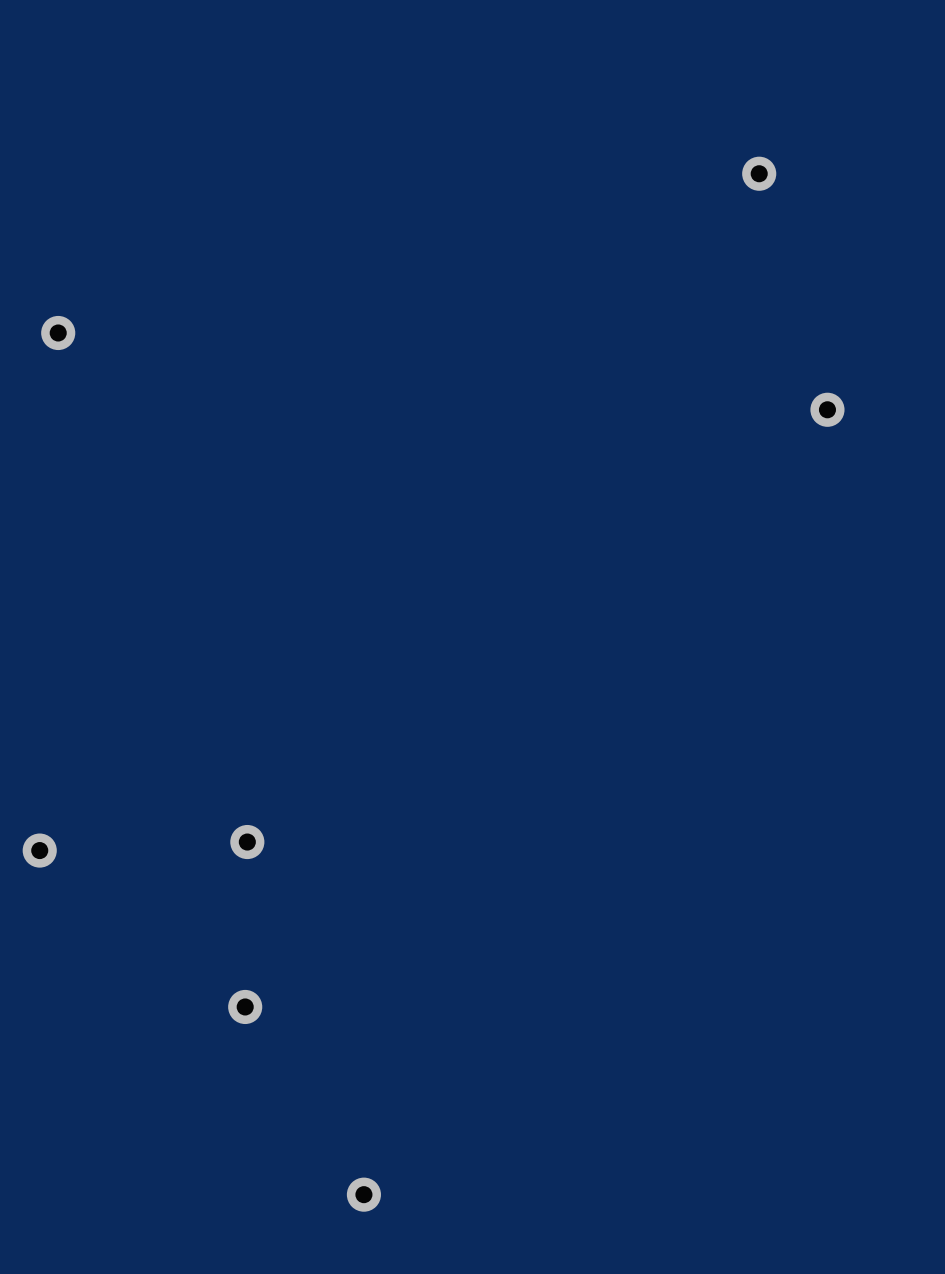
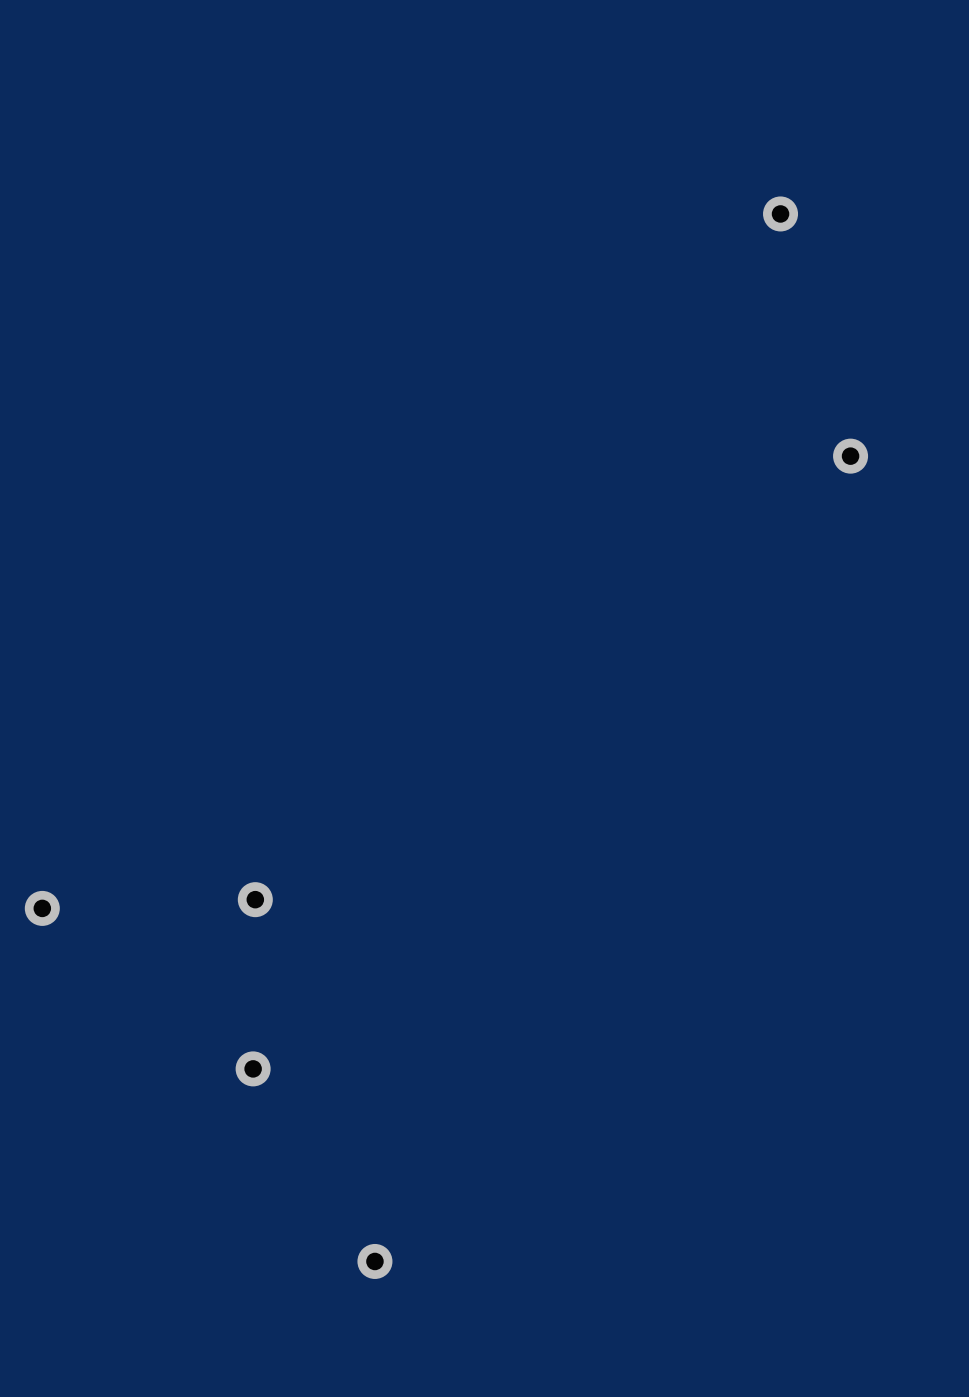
via: (58, 332) -> none

